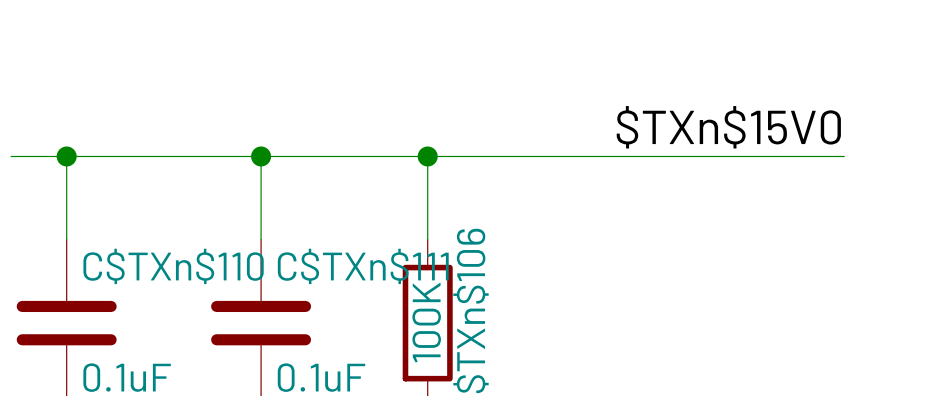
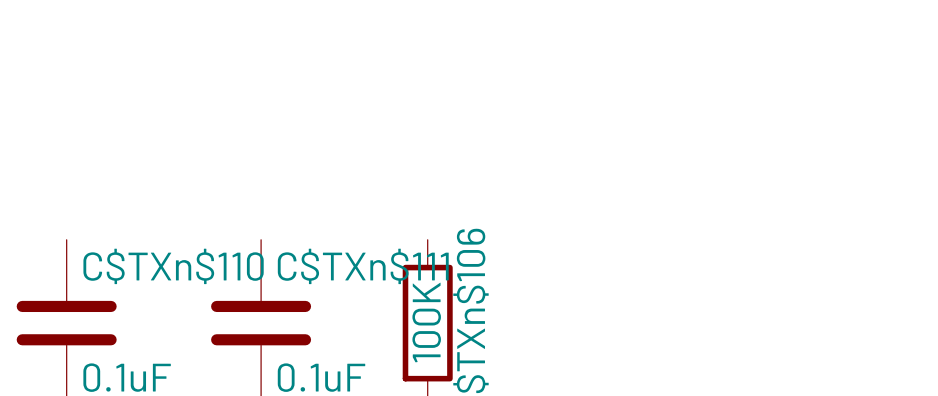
label: $TXn$15V0 (728, 127) -> none
wire: (11, 156) (844, 156) -> none
wire: (66, 156) (66, 239) -> none
junction: (66, 156) -> none
wire: (261, 156) (261, 239) -> none
junction: (261, 156) -> none
wire: (427, 156) (427, 239) -> none
junction: (427, 156) -> none

